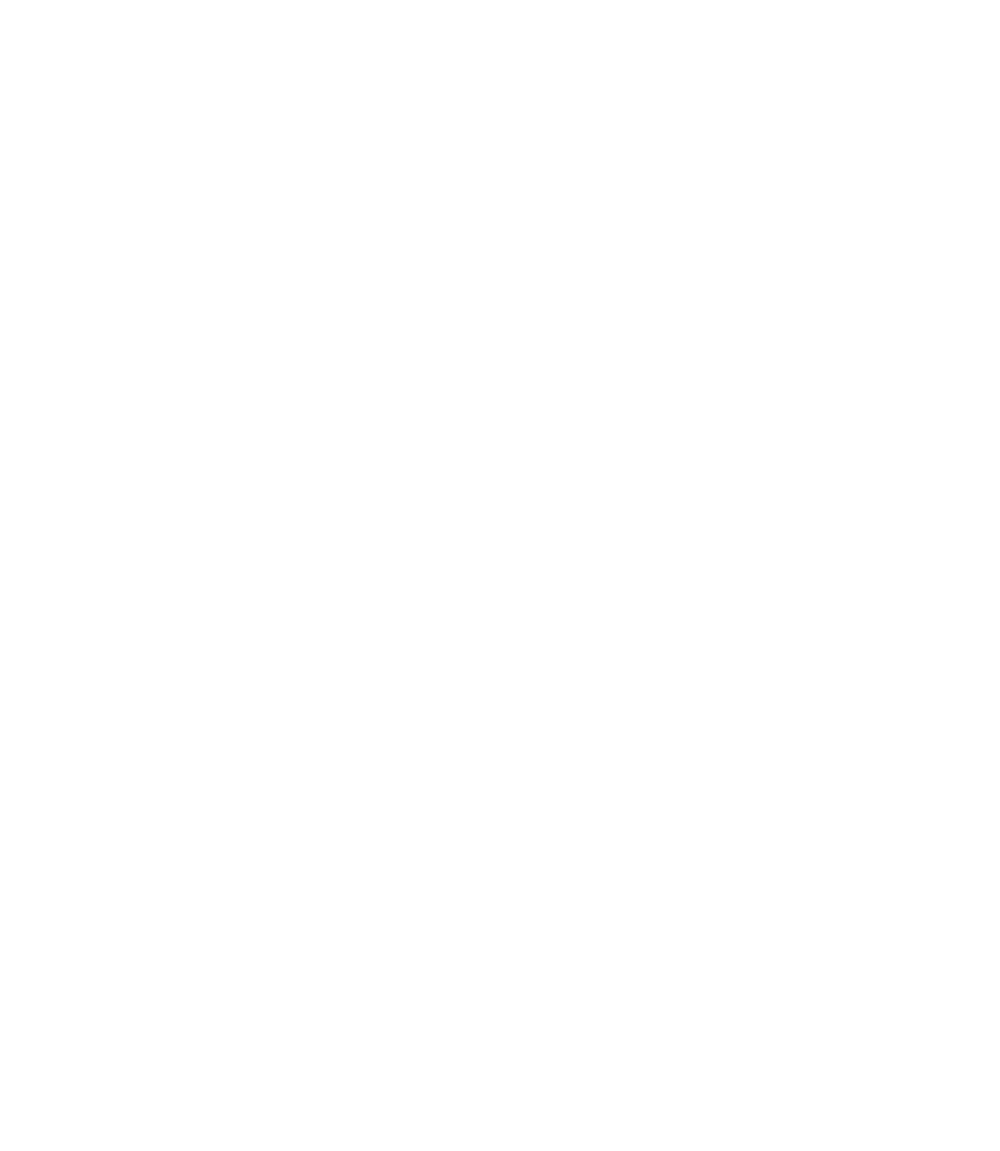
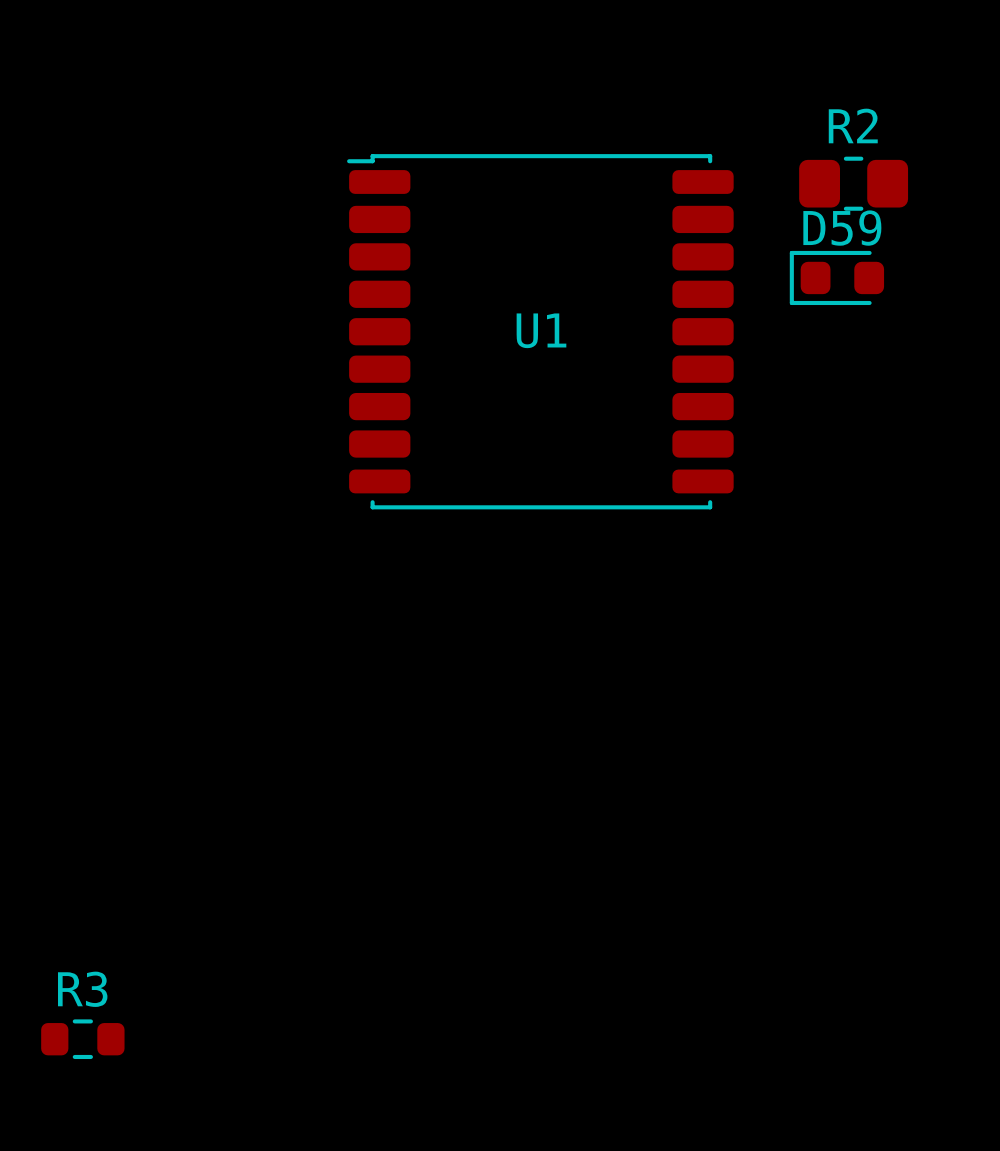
R2: none -> (853, 183)
D59: none -> (836, 277)
U1: none -> (540, 331)
R3: none -> (82, 1039)

